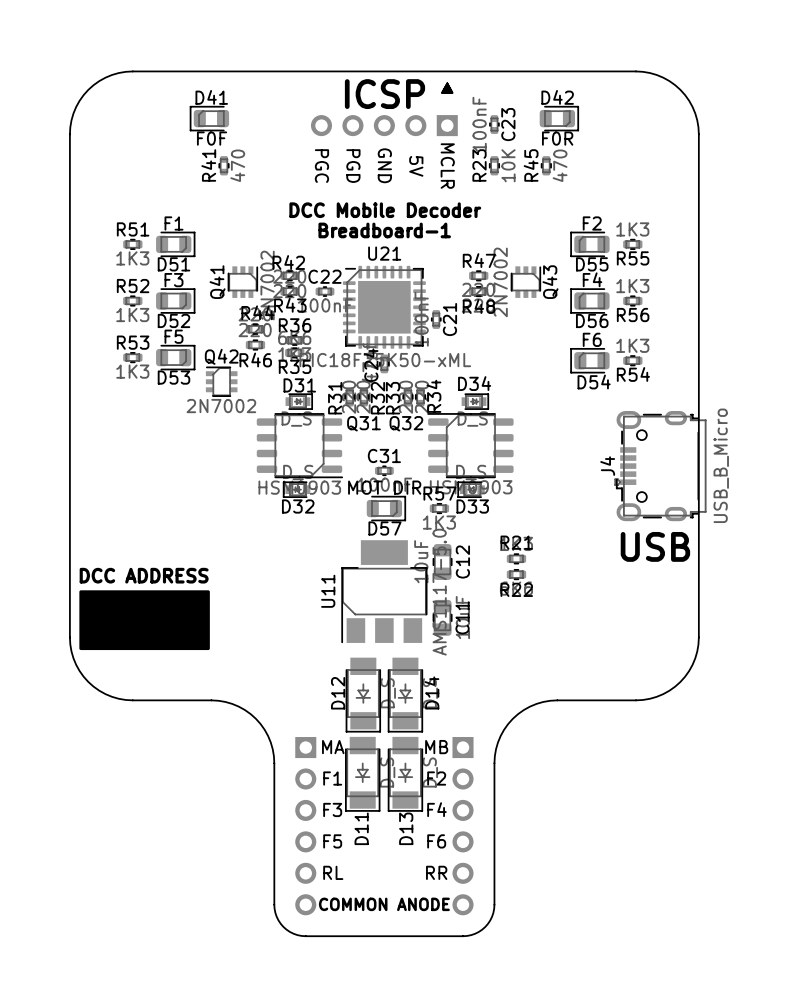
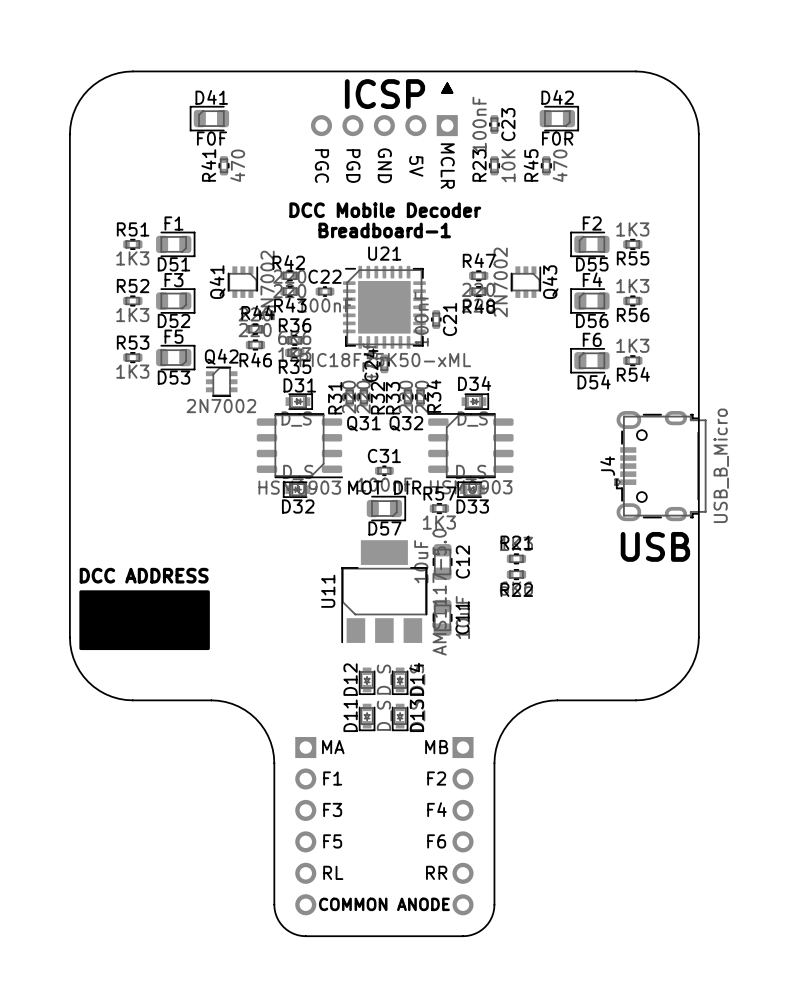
D12 footprint: [345, 657, 381, 733] -> [358, 667, 376, 695]
D14 footprint: [387, 657, 424, 733] -> [391, 667, 409, 695]
D11 footprint: [345, 736, 381, 812] -> [358, 703, 376, 732]
D13 footprint: [387, 736, 424, 812] -> [391, 703, 409, 732]
D11 name position: D11 (361, 828) -> D11 (350, 715)
D13 name position: D13 (406, 828) -> D13 (416, 715)

